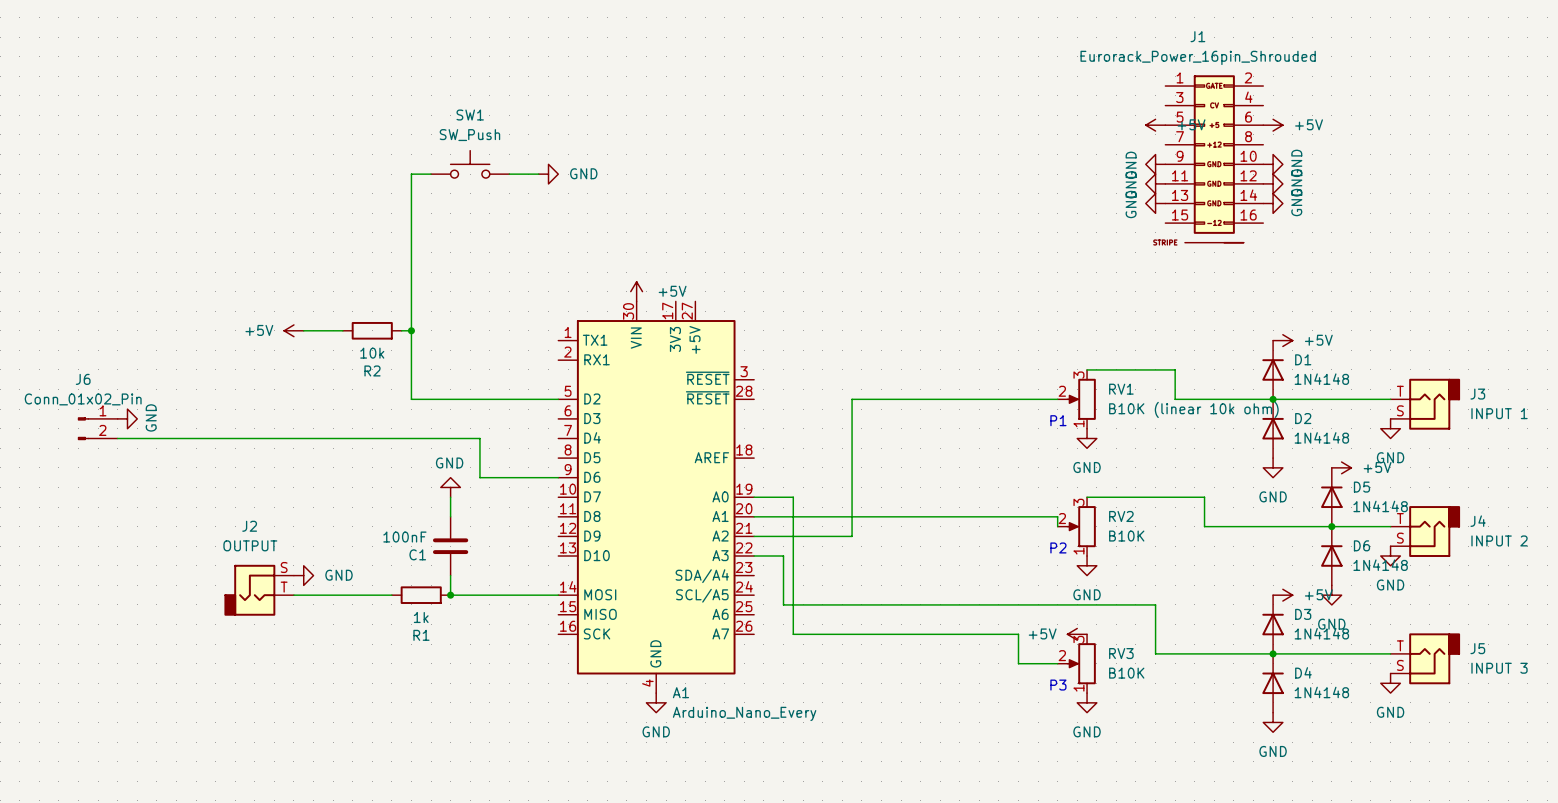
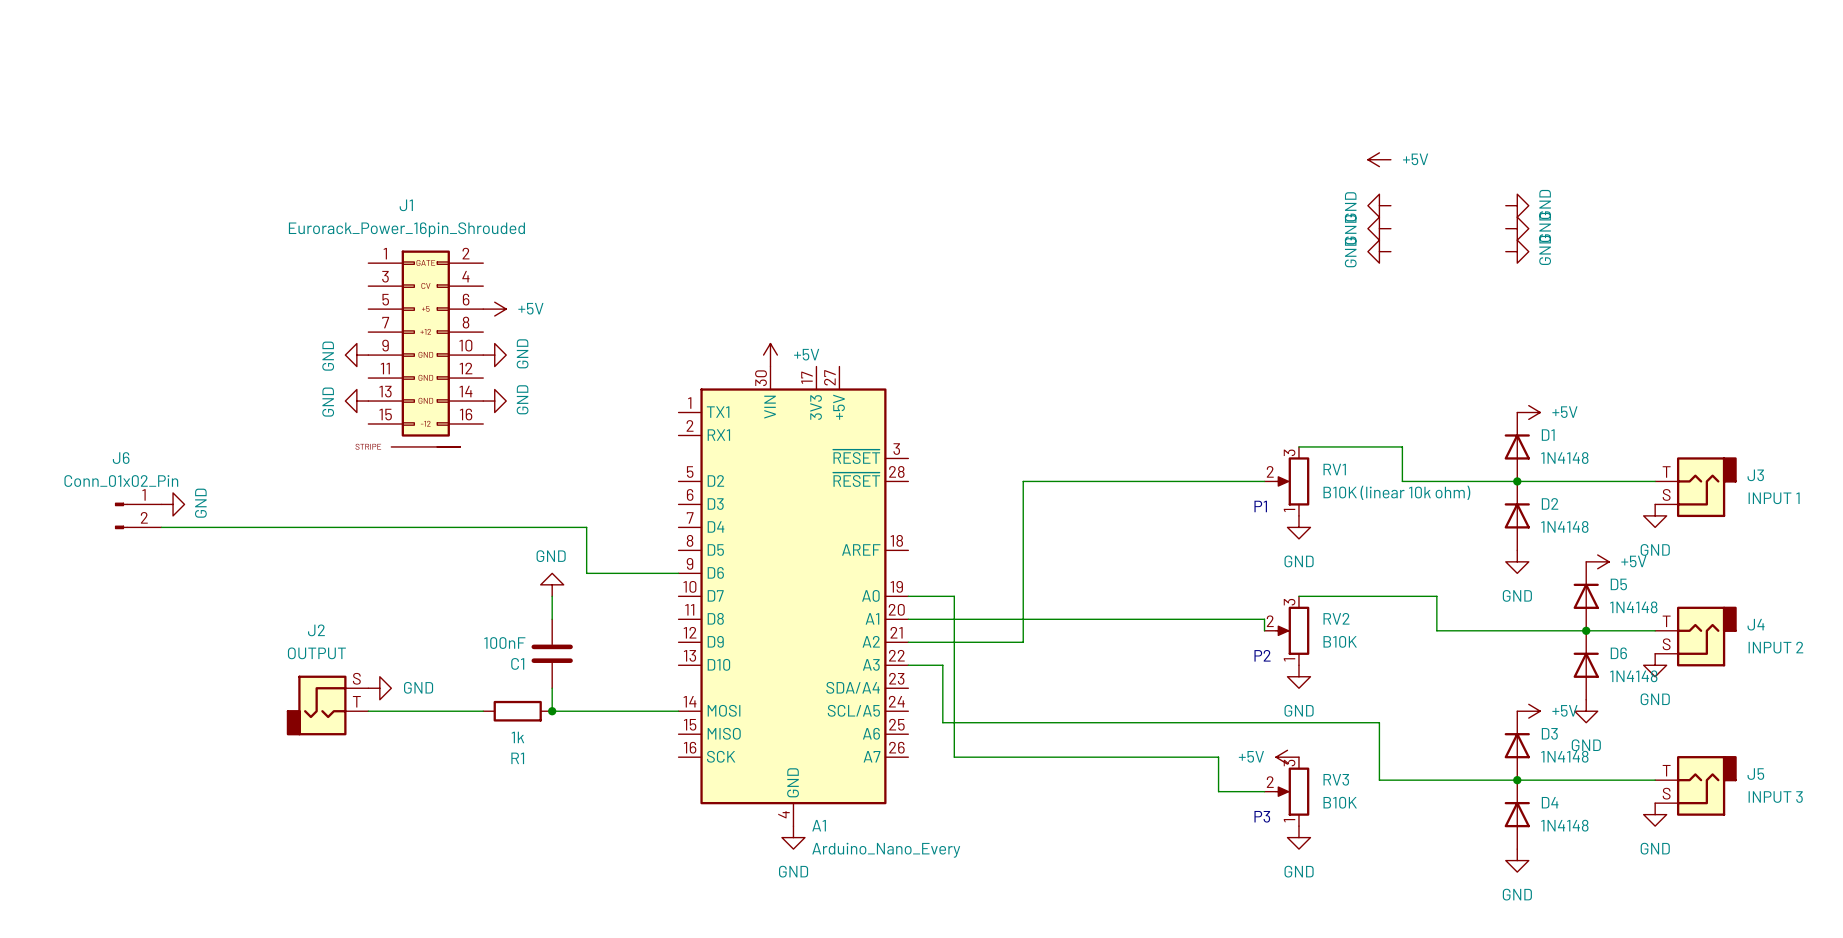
power symbol: +5V (1273, 125) -> none
J1 position: (1214, 158) -> (425, 348)
SW1: SW_Push (470, 164) -> none
wire: (431, 174) (411, 174) (411, 399) (558, 399) -> none
wire: (509, 174) (538, 174) -> none
power symbol: GND (548, 174) -> none
power symbol: none -> GND (356, 355)
power symbol: none -> GND (494, 355)
power symbol: none -> GND (356, 401)
power symbol rotation: 0° (293, 330) -> 180° (494, 309)
power symbol position: +5V (293, 330) -> +5V (494, 309)
R2: 10k (372, 330) -> none
wire: (401, 330) (411, 330) -> none
power symbol: none -> GND (494, 401)
junction: (411, 330) -> none

